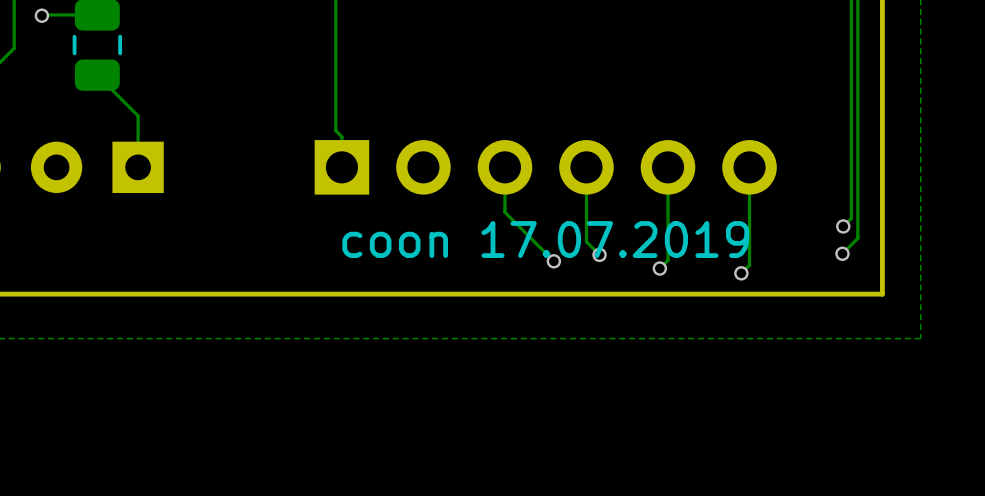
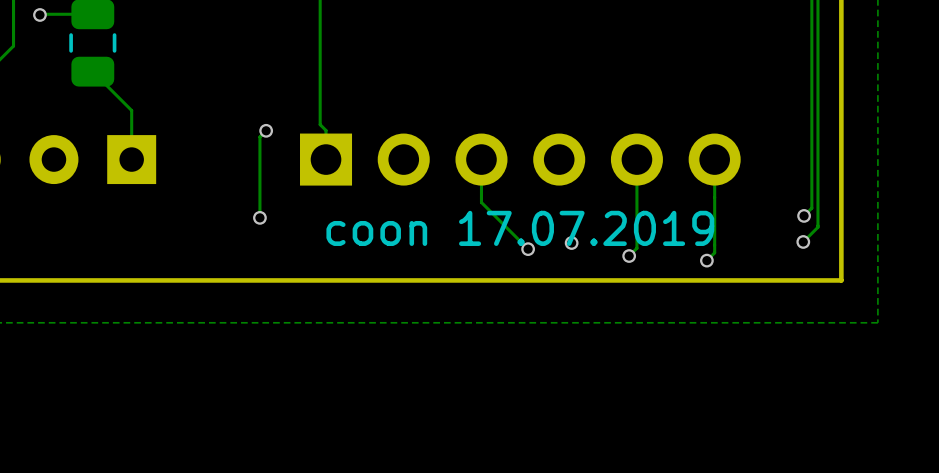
track: none -> (266, 130) (259, 137) (259, 217)
via: none -> (266, 130)
track: (586, 167) (586, 241) (599, 254) -> none
via: none -> (259, 217)

